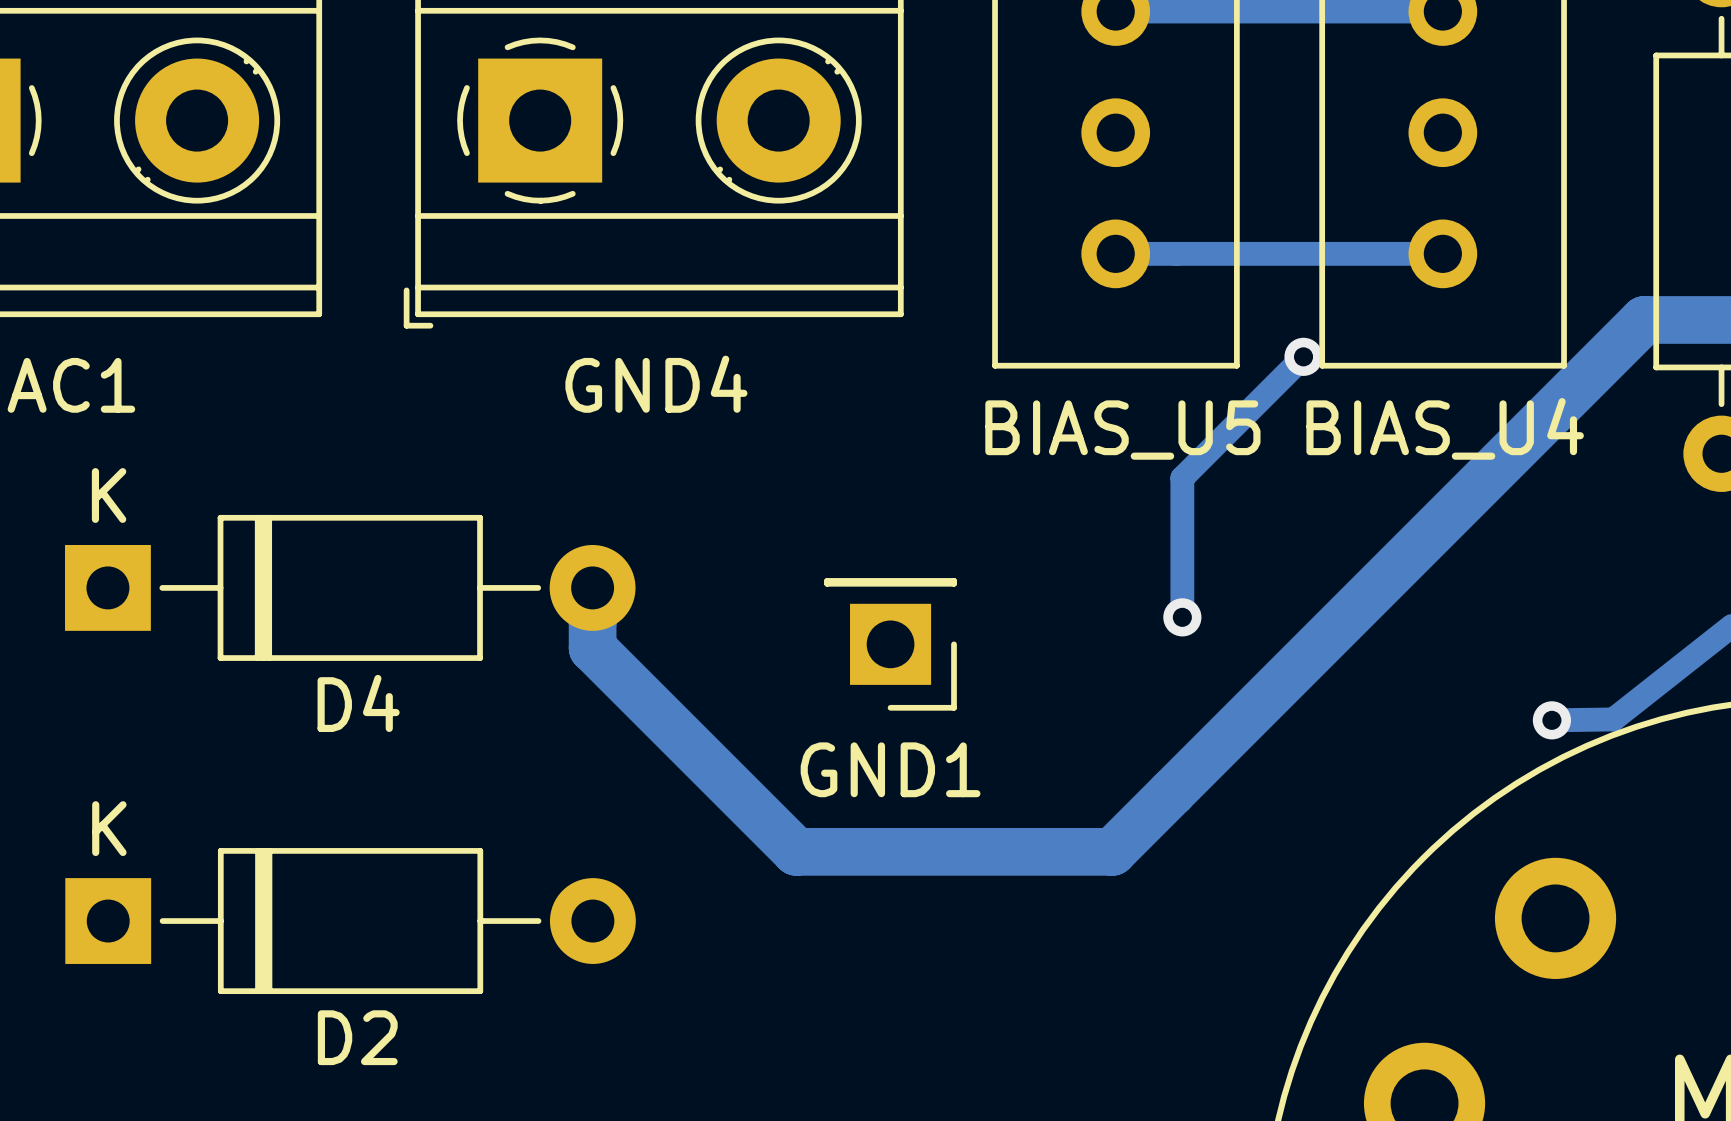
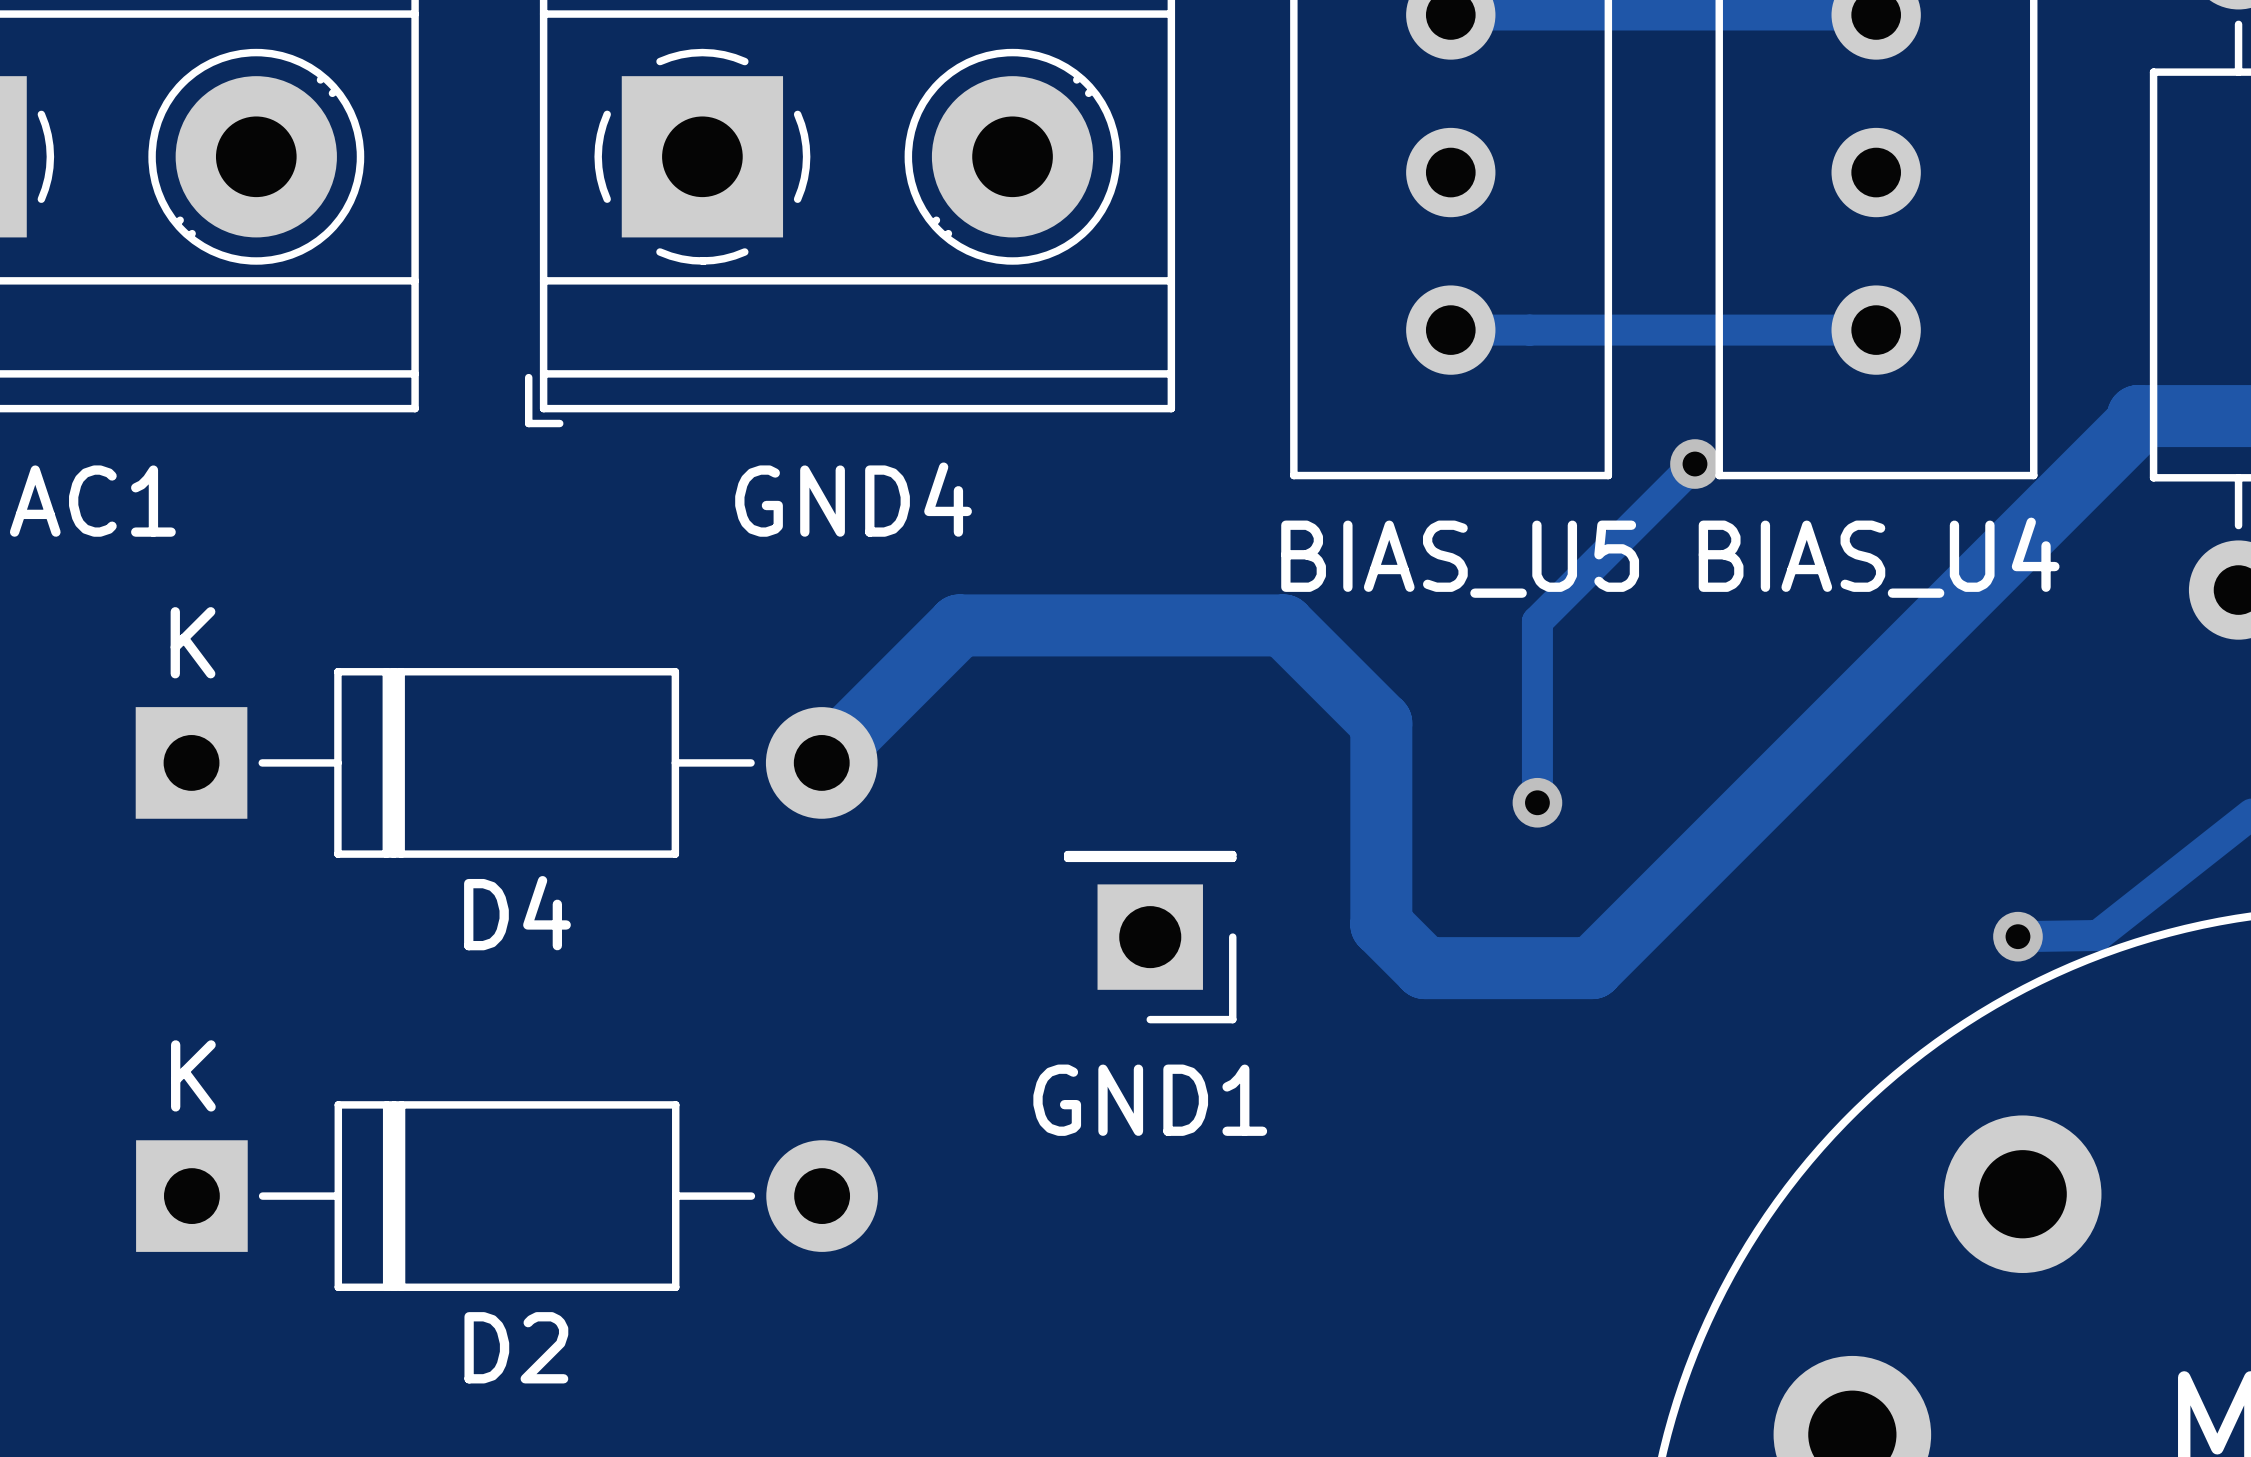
track: (1644, 319) (1112, 851) (796, 851) (592, 648) (592, 587) -> (2138, 416) (2138, 422) (1592, 968) (1424, 968) (1381, 924) (1381, 723) (1283, 625) (959, 625) (821, 762)
D4 position: (350, 587) -> (506, 762)
GND1 position: (890, 644) -> (1150, 937)
D2 position: (350, 921) -> (507, 1196)

